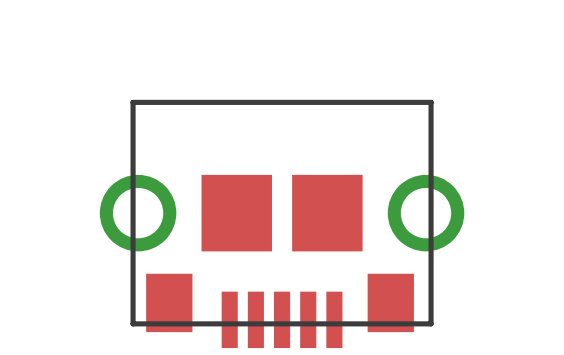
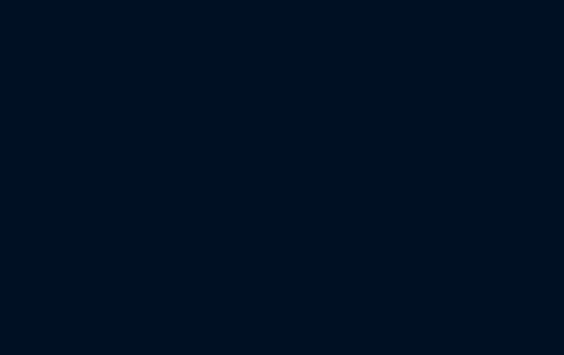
part: (282, 223) -> none

